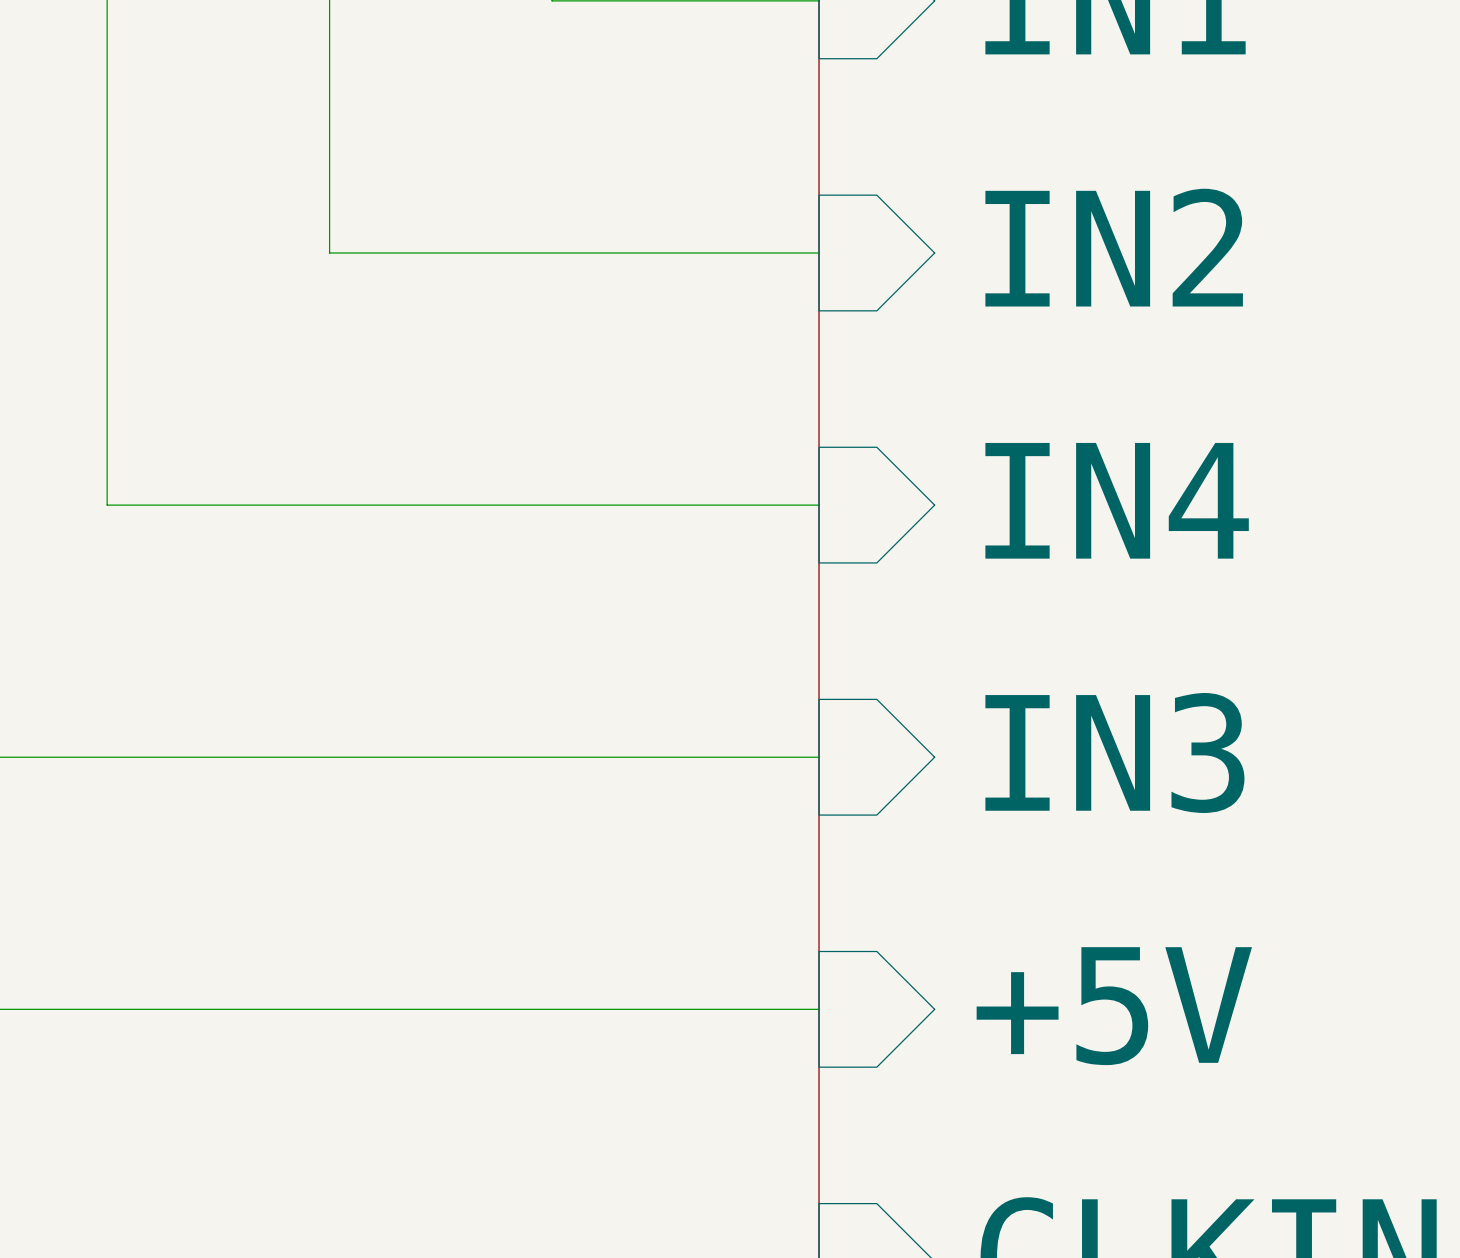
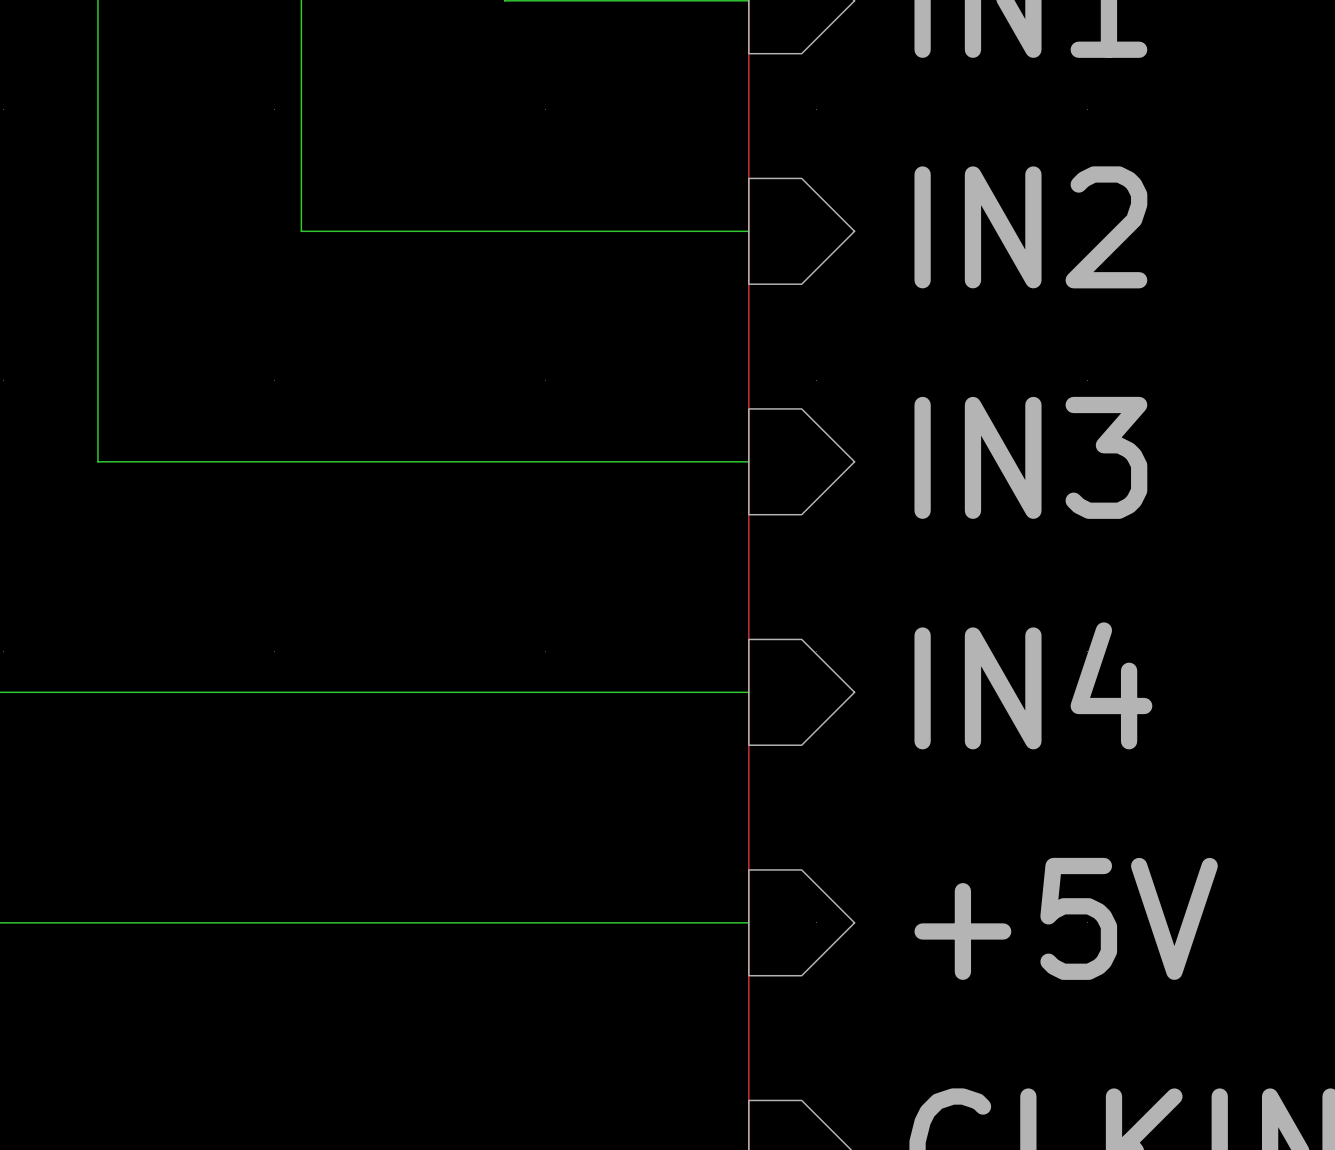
sheet pin: IN4 (1117, 500) -> IN3 (1030, 457)
sheet pin: IN3 (1114, 752) -> IN4 (1033, 685)

